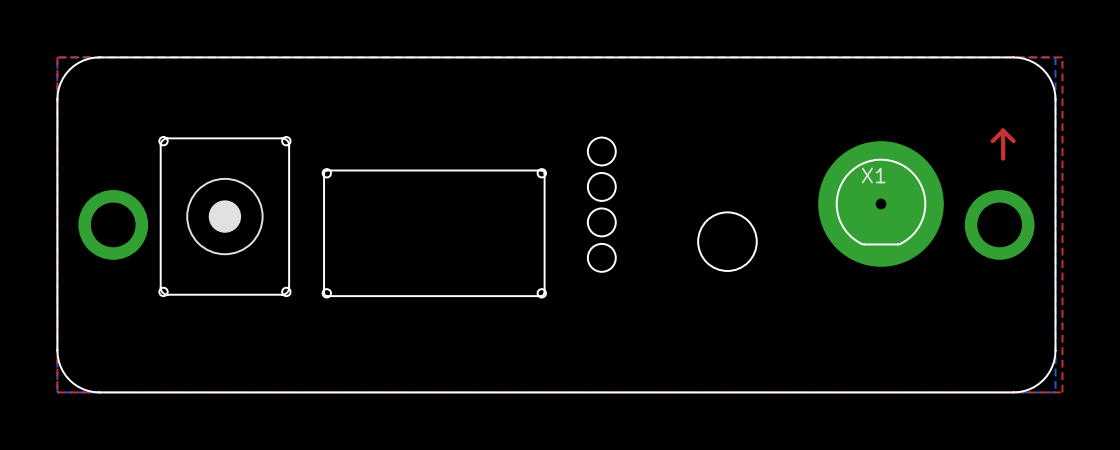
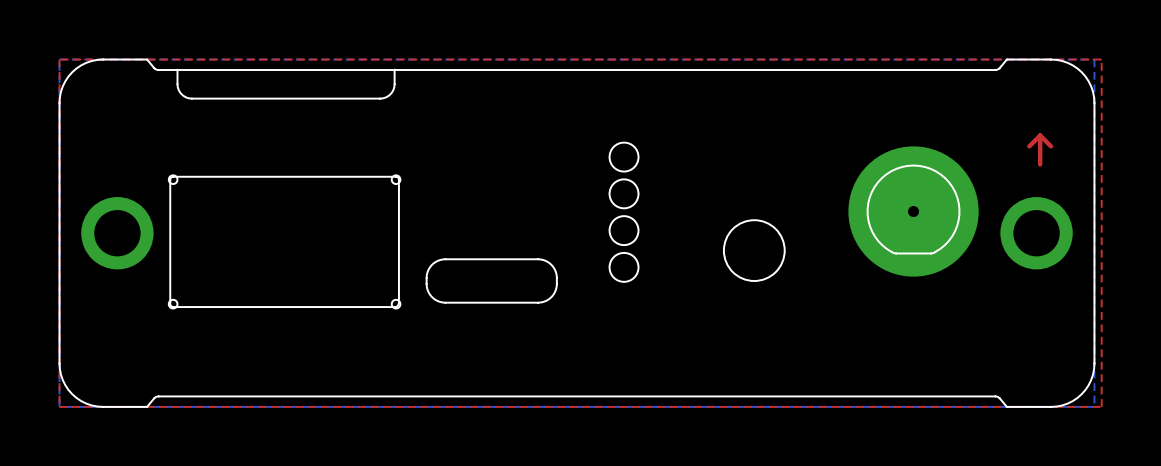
part footprint: [57, 57, 1056, 393] -> [59, 59, 1095, 408]
board edge: none -> (177, 69) (178, 90) (184, 96) (191, 98) (381, 98) (387, 96) (393, 90) (394, 69)
X1 name: X1 (873, 175) -> none
part: (224, 216) -> none
part position: (434, 233) -> (284, 241)
board edge: none -> (445, 259) (542, 259) (549, 263) (555, 269) (556, 288) (549, 298) (540, 302) (441, 302) (429, 293) (426, 285) (426, 275) (433, 263) (445, 259)

